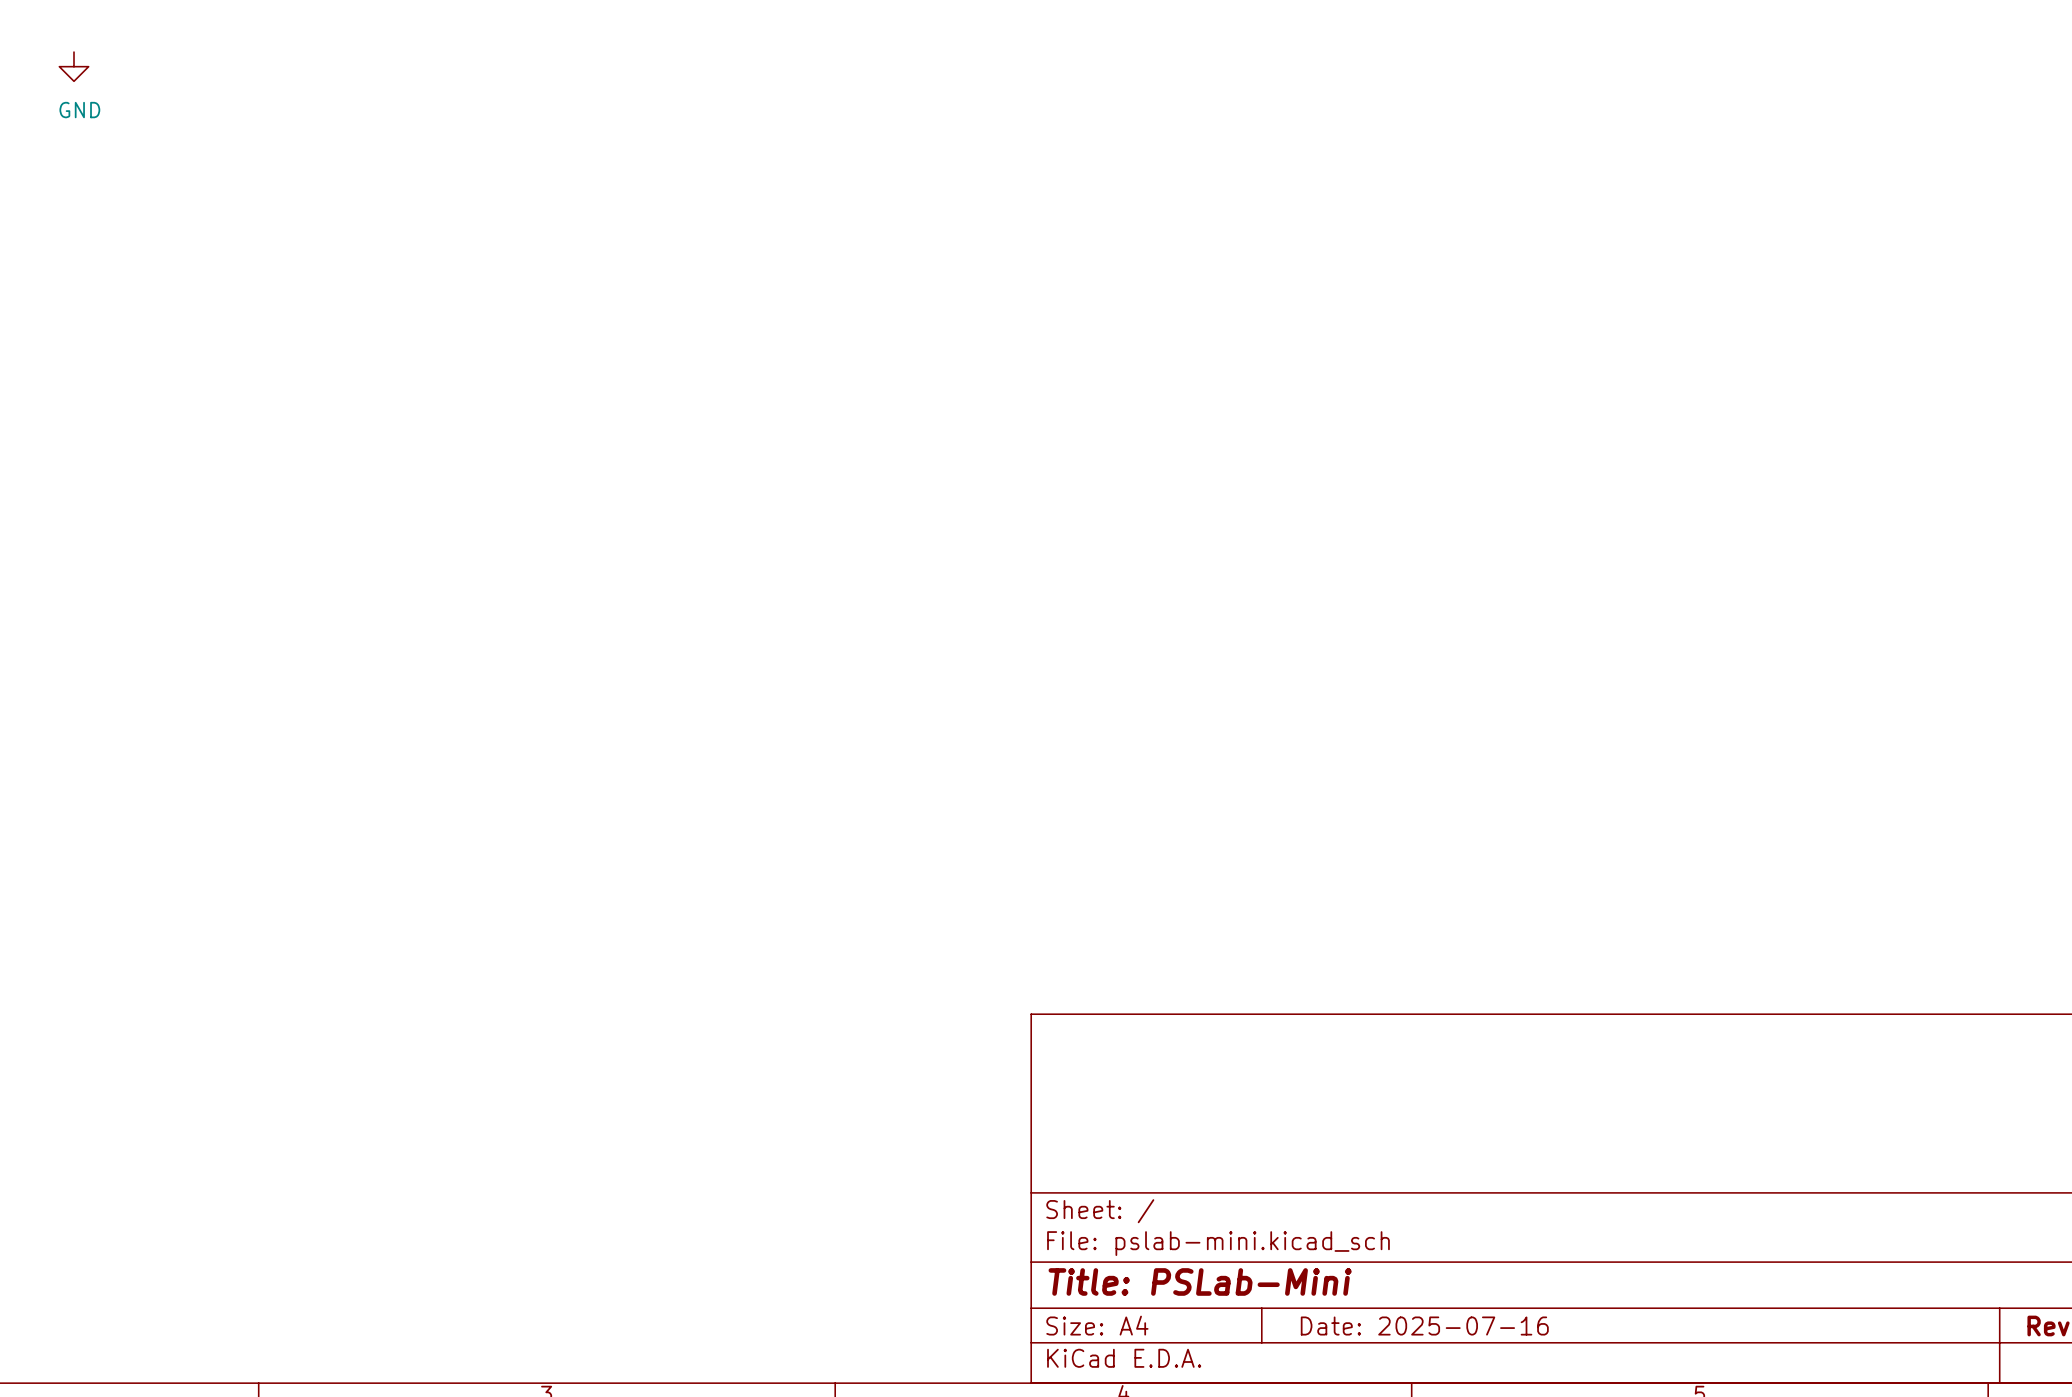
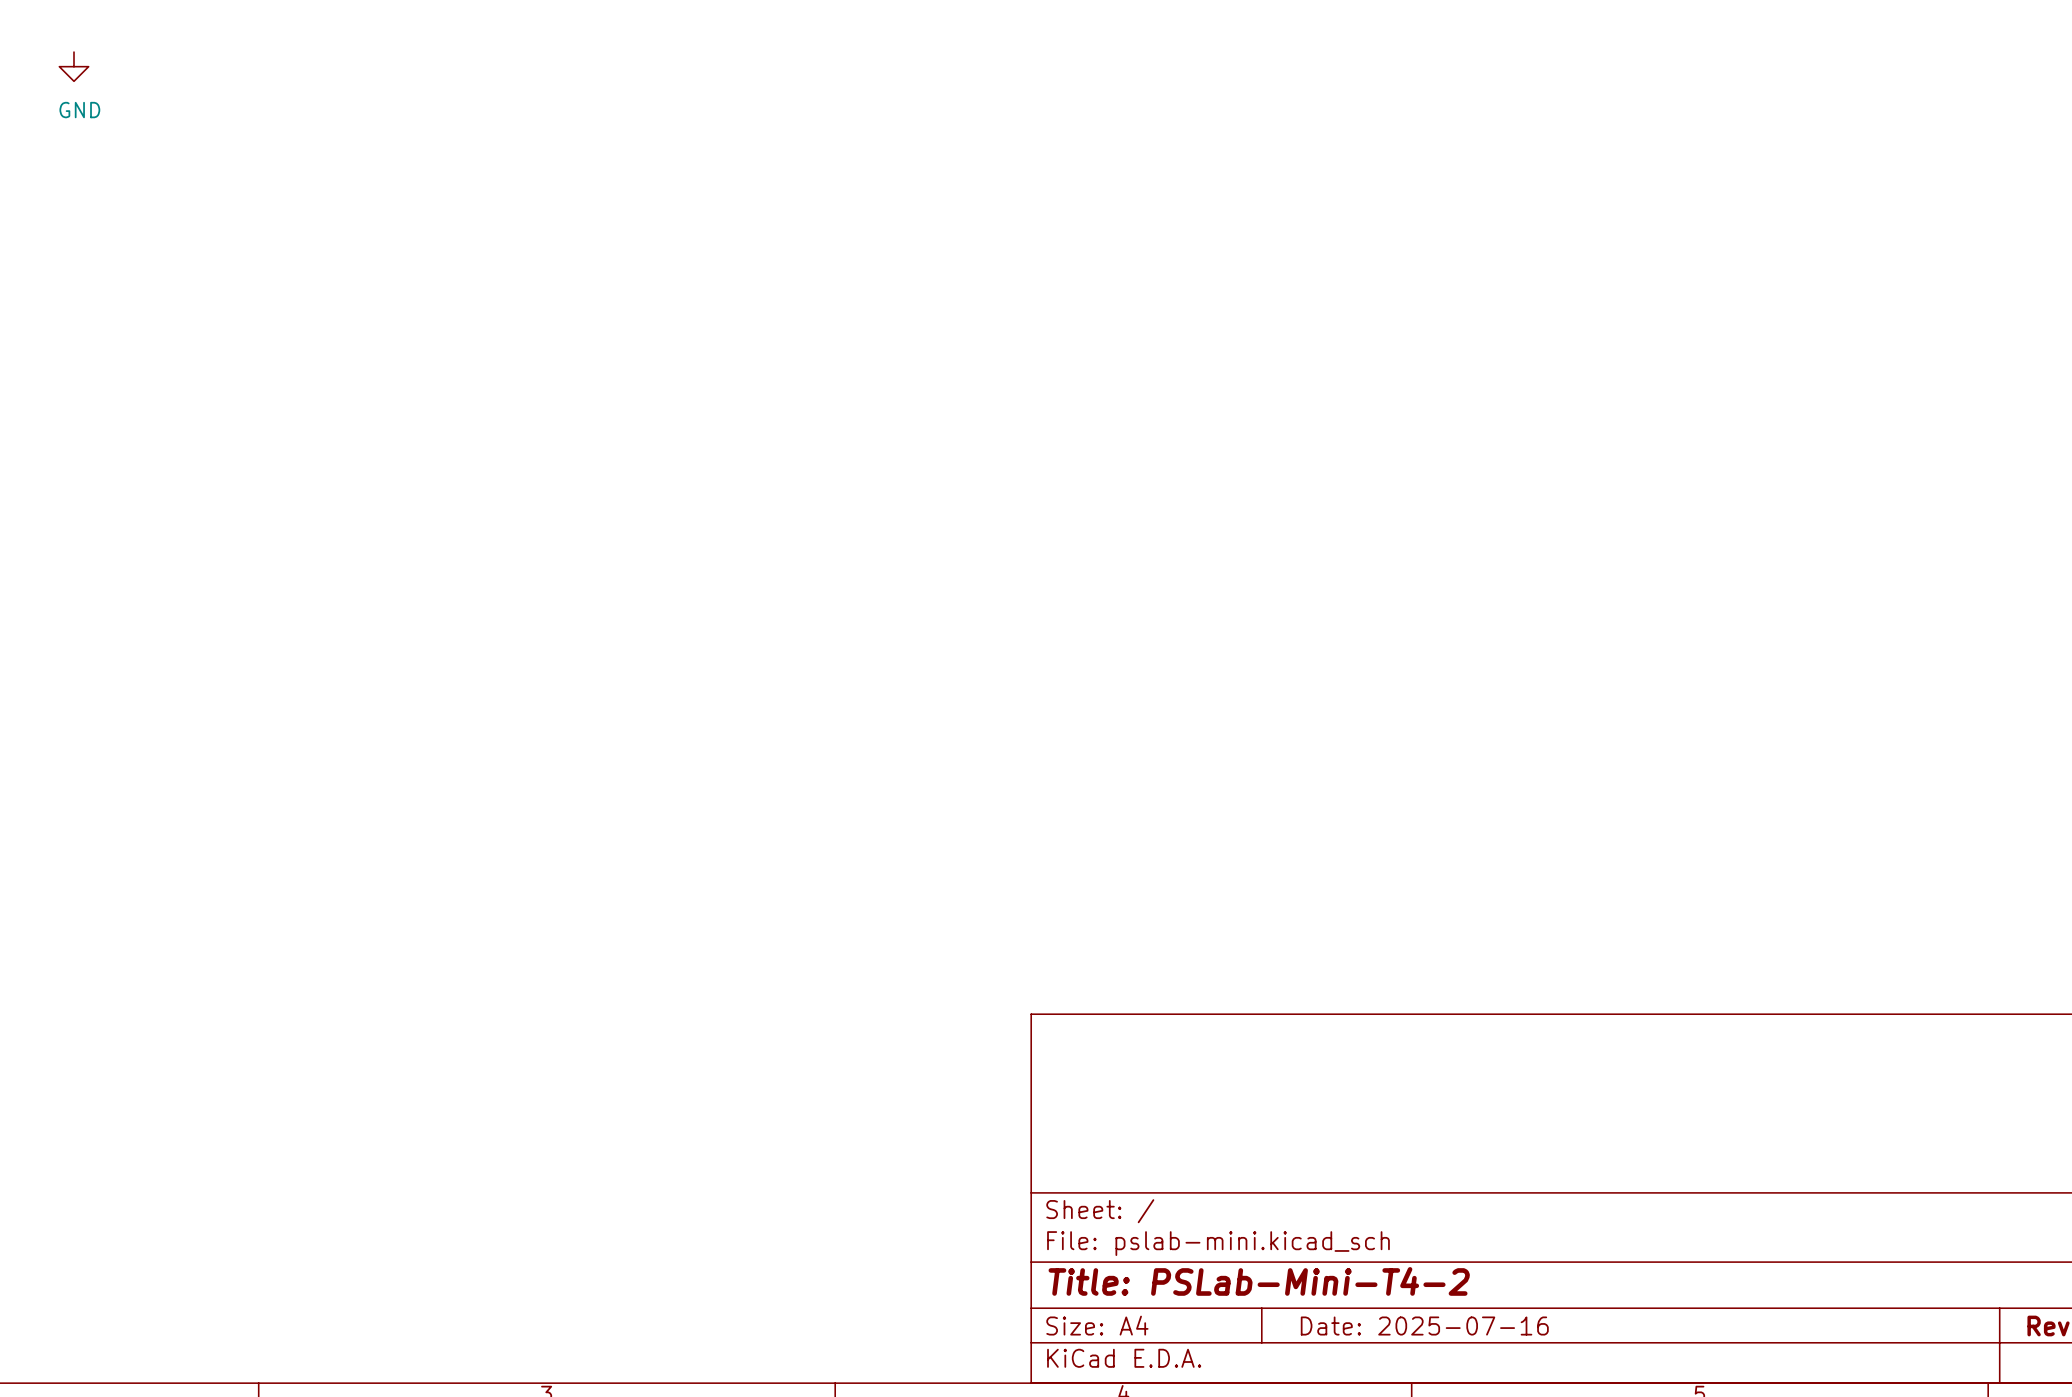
title block: Title: PSLab-Mini (1200, 1281) -> Title: PSLab-Mini-T4-2 (1259, 1281)

